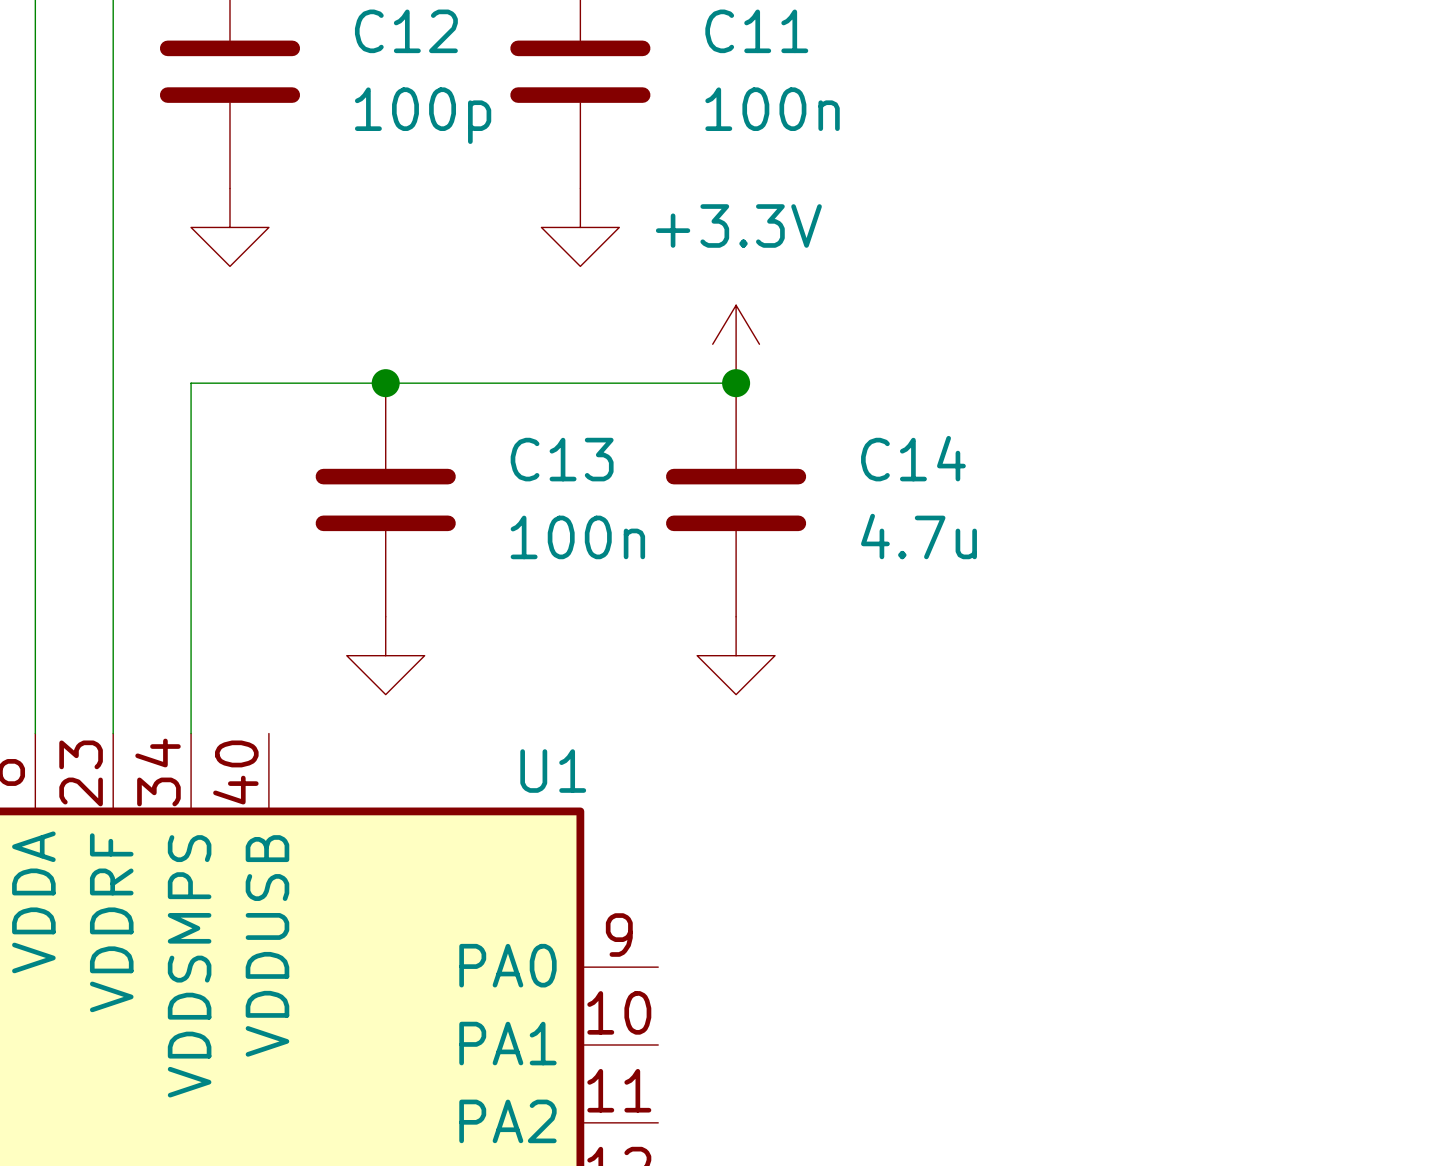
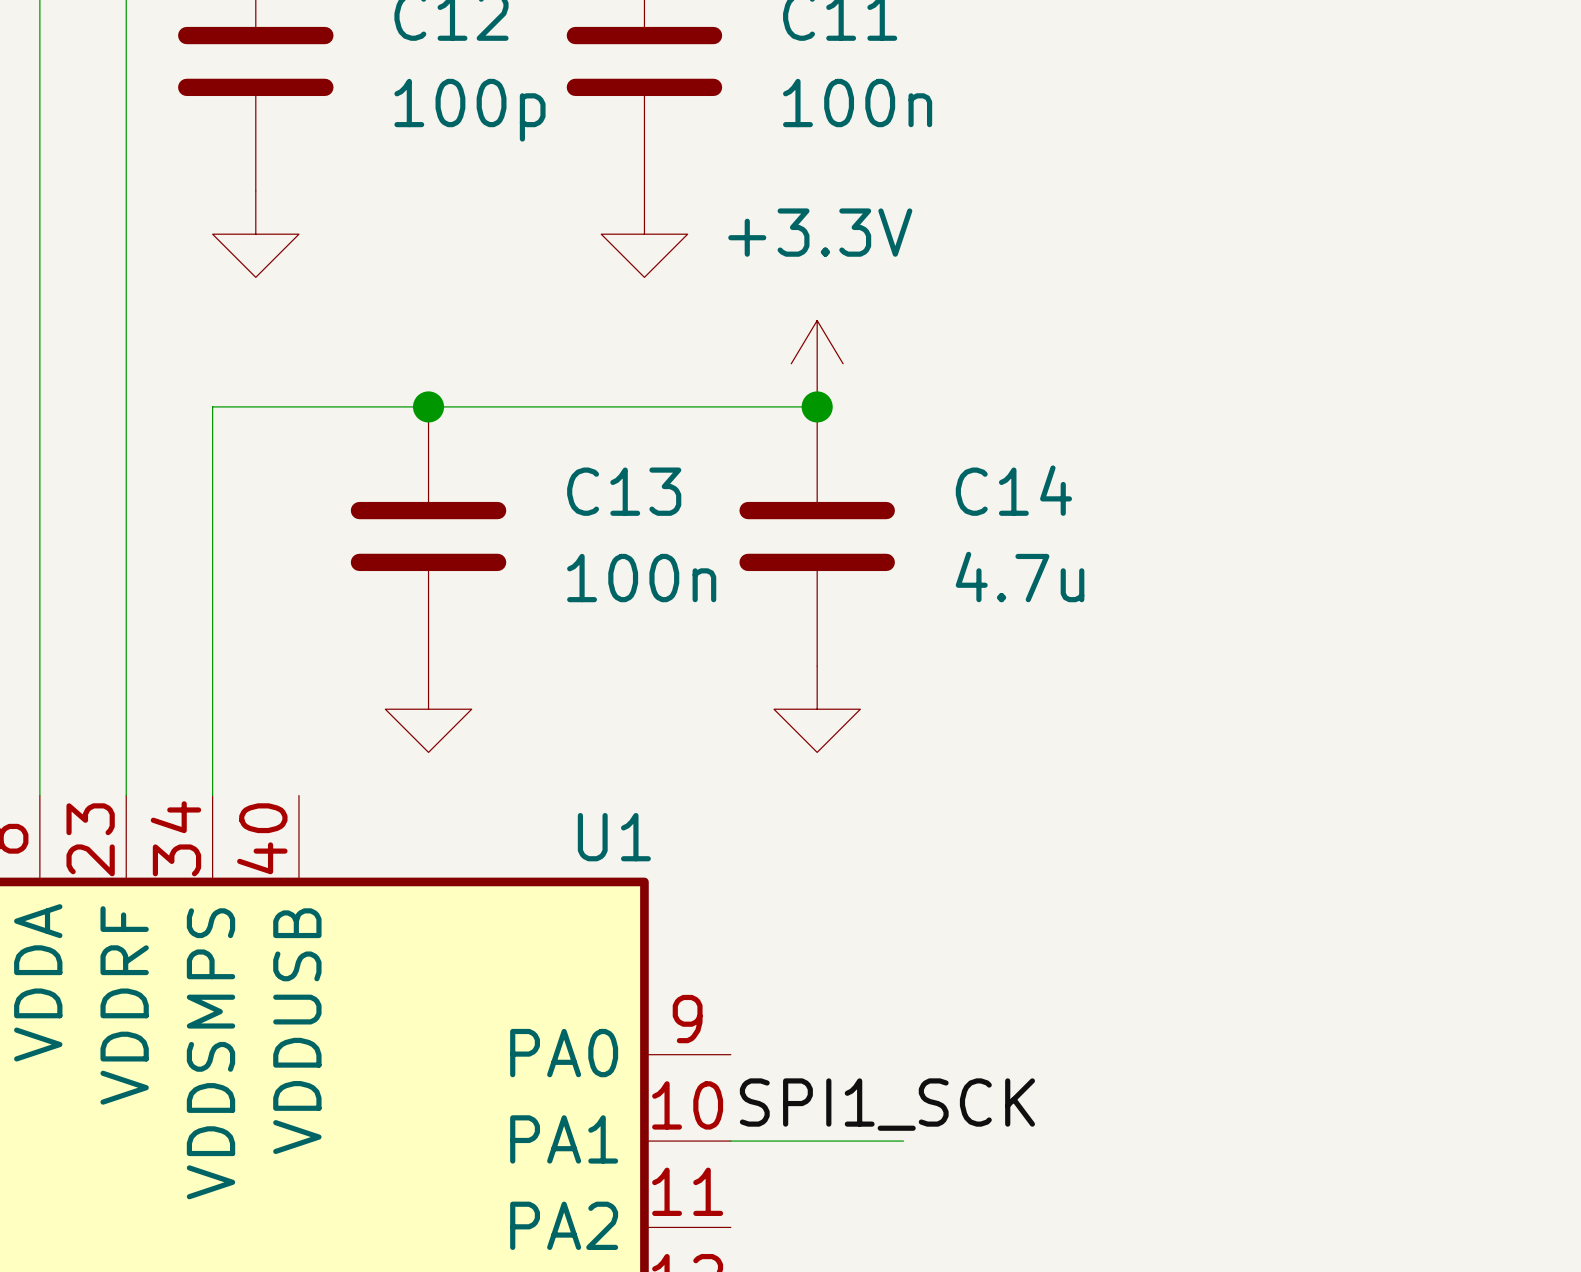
label: none -> SPI1_SCK (887, 1104)
wire: none -> (730, 1141) (903, 1141)

